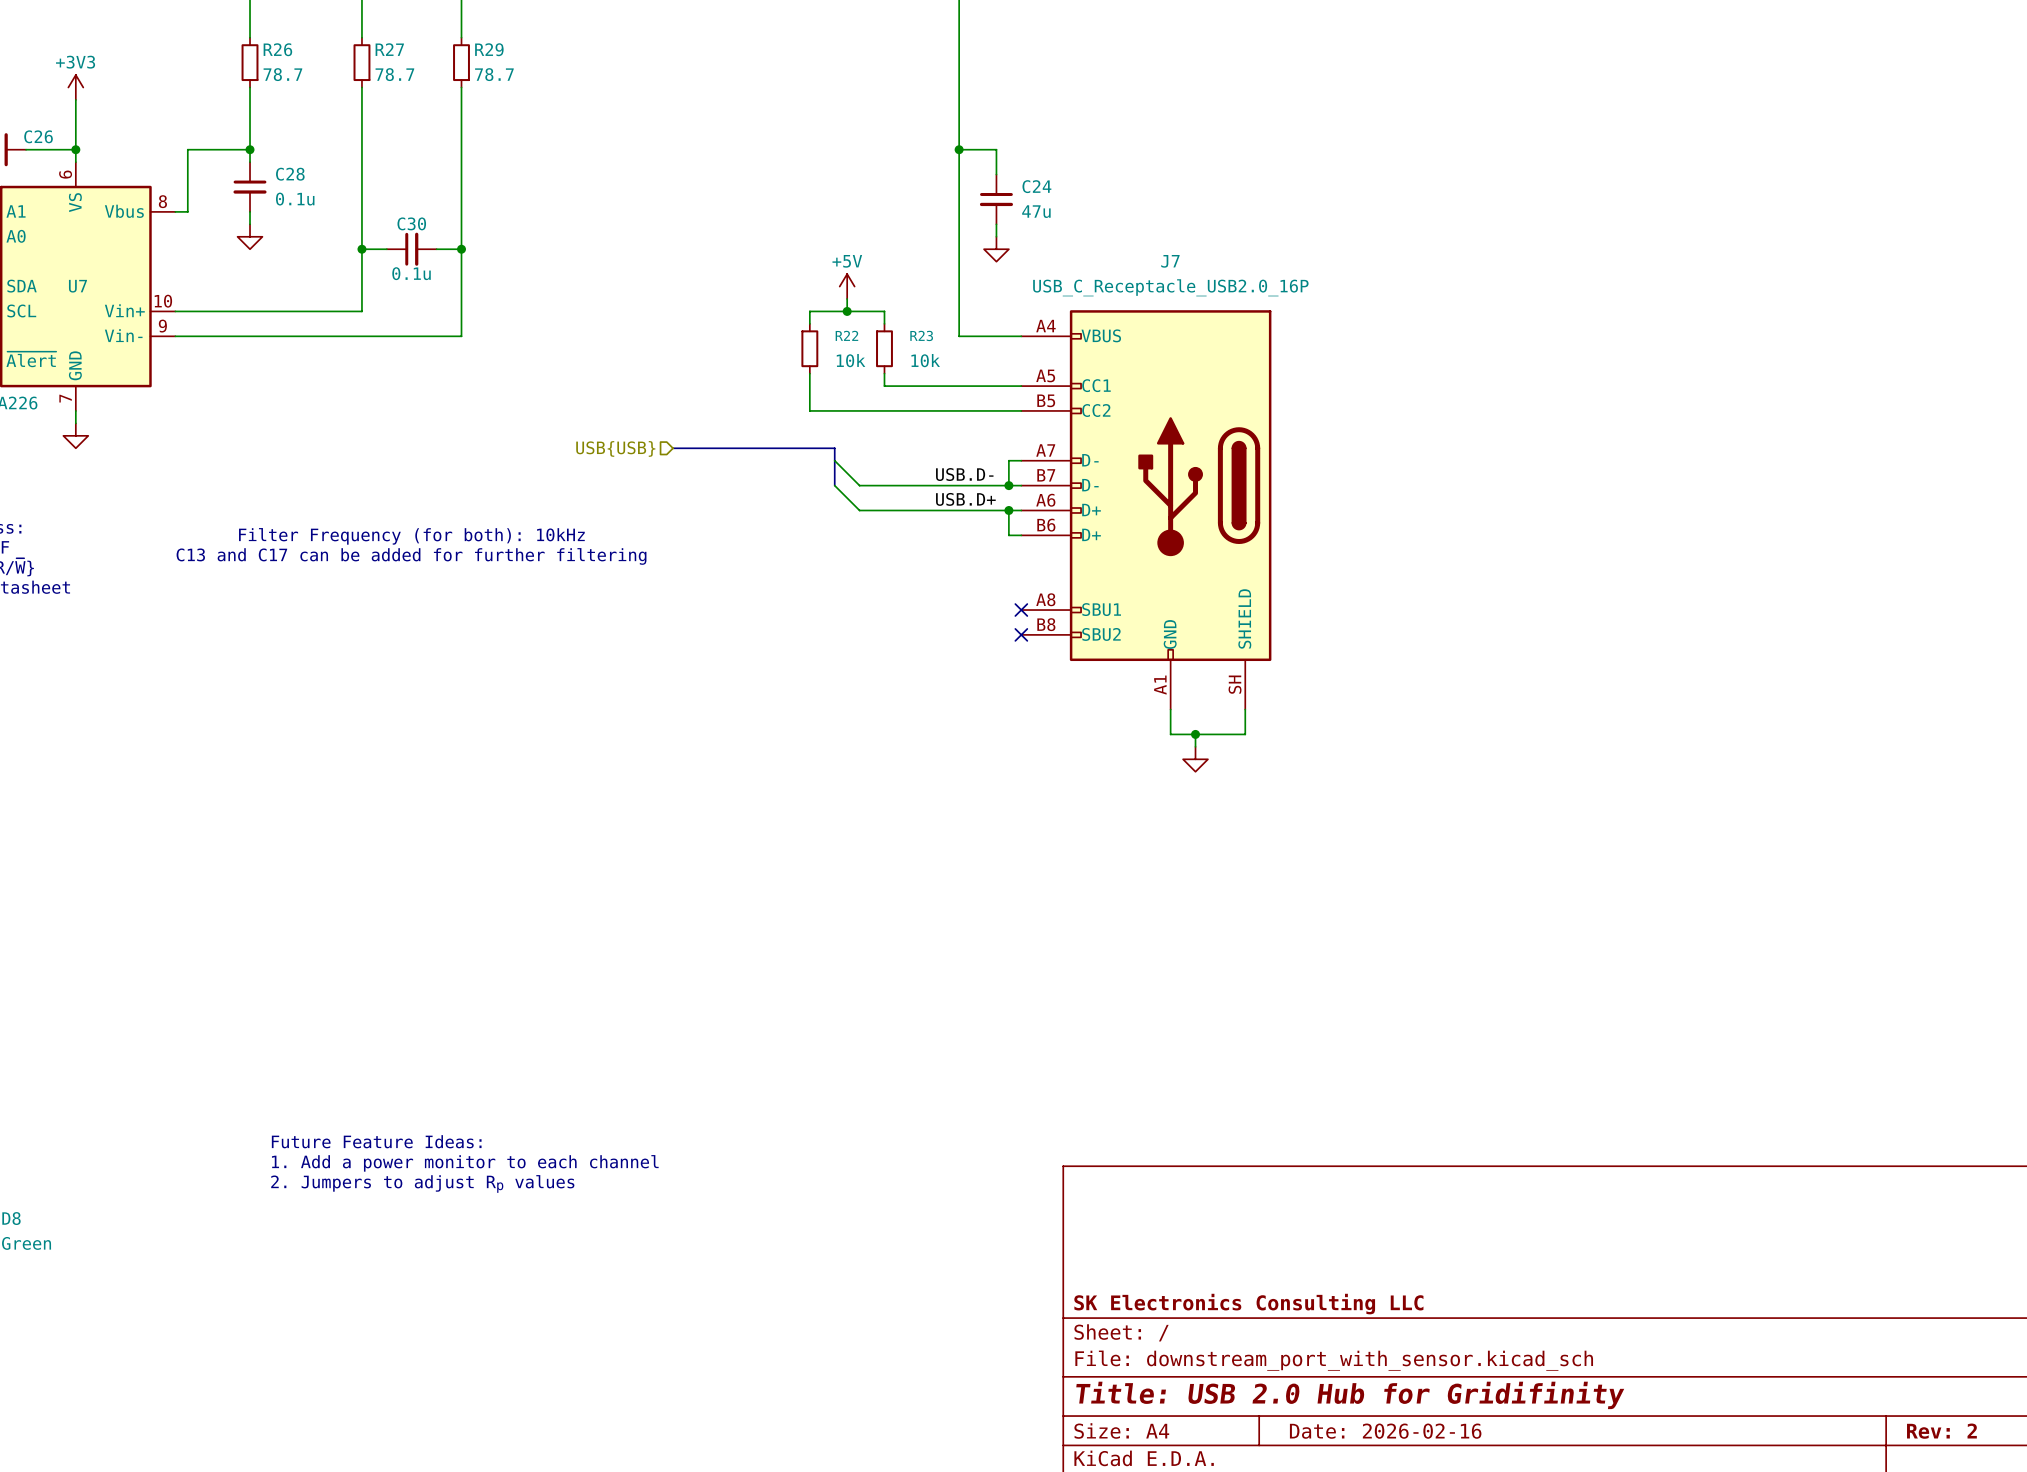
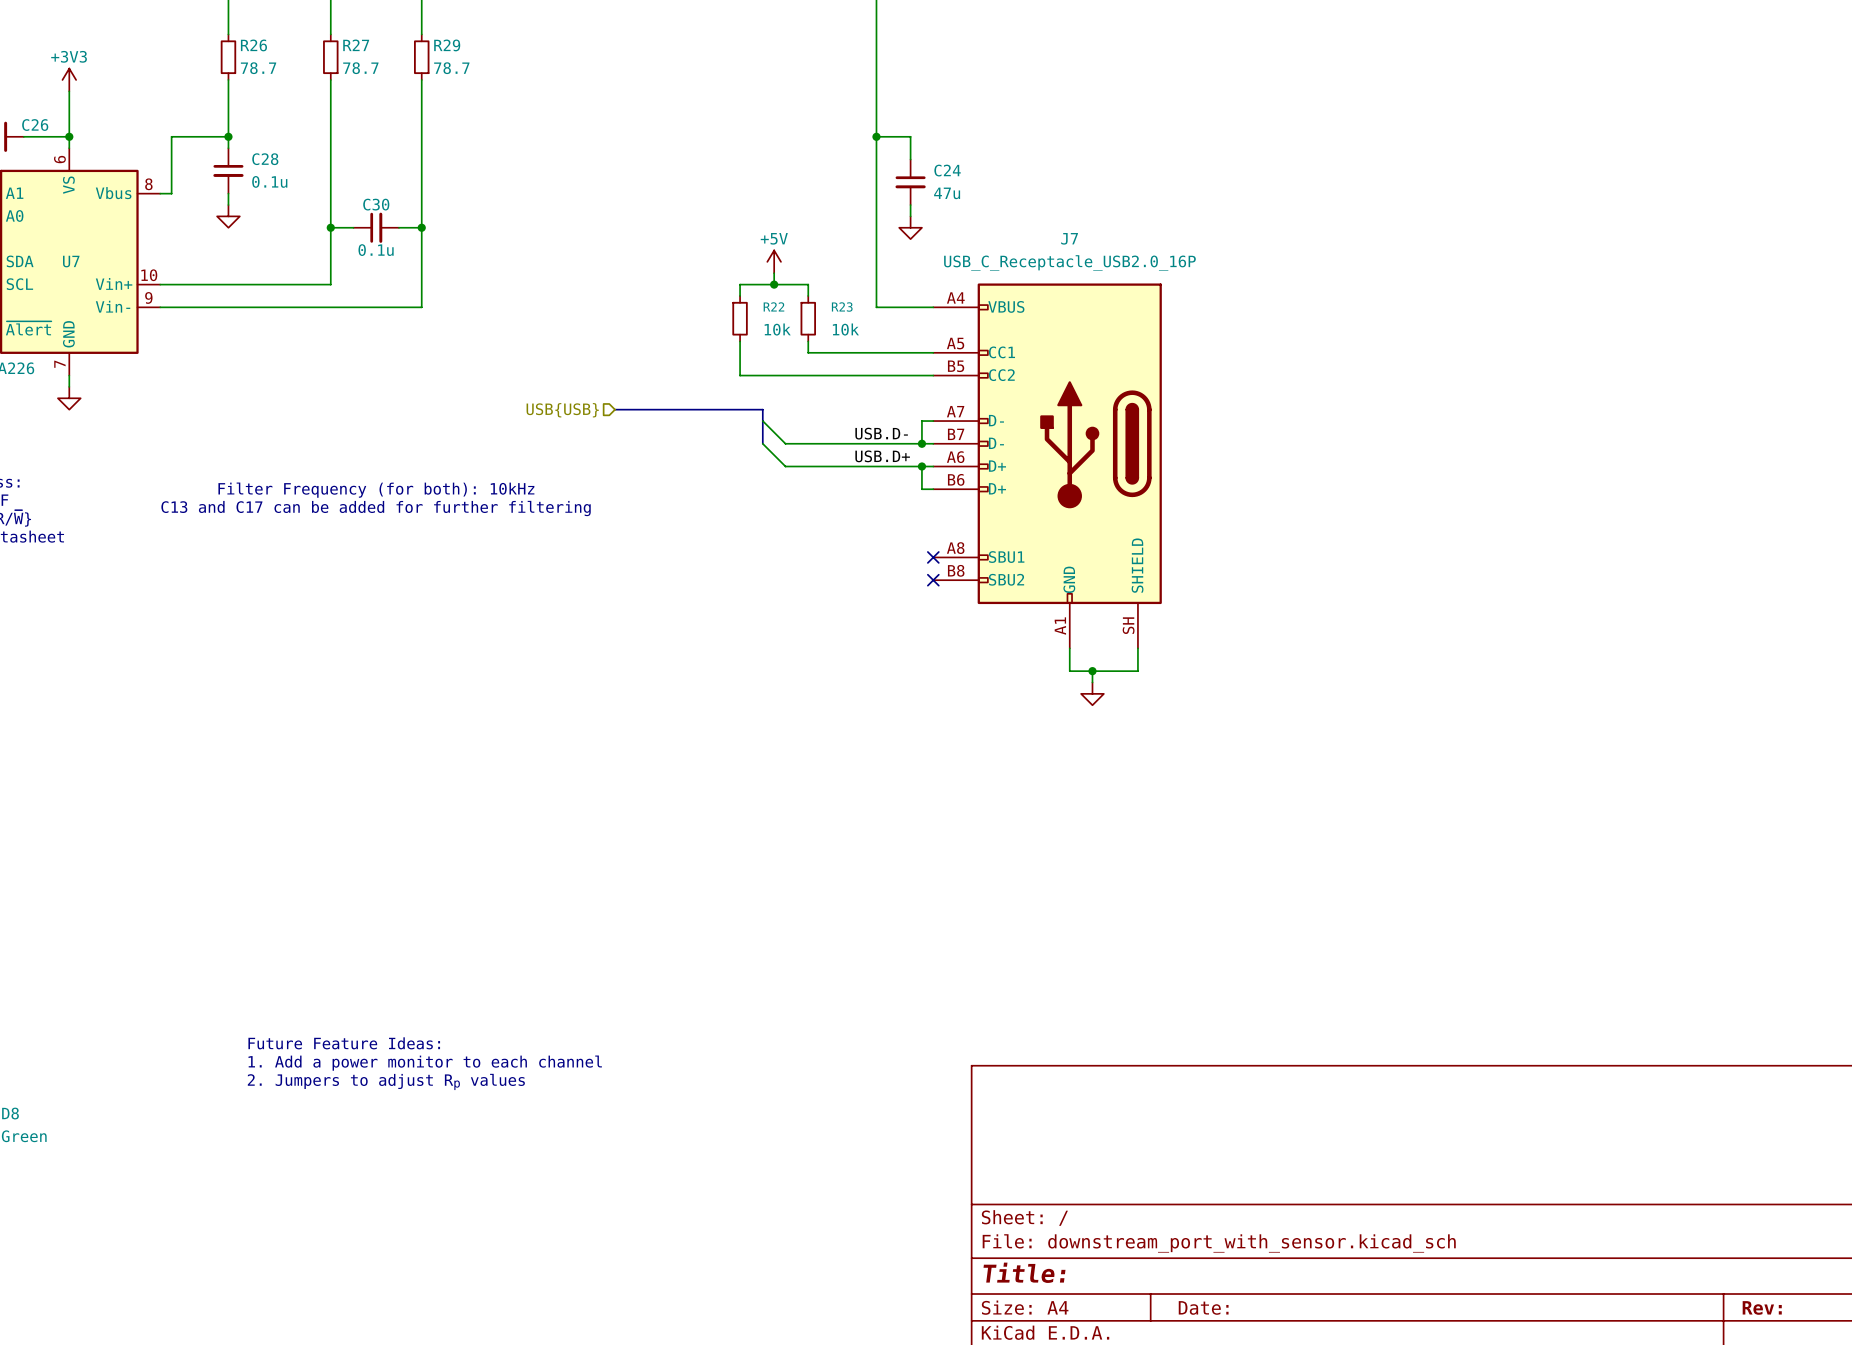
title block: SK Electronics Consulting LLC (1248, 1304) -> none
title block: Title: USB 2.0 Hub for Gridifinity (1350, 1395) -> Title: (1024, 1272)
title block: Date: 2026-02-16 (1385, 1431) -> Date: (1203, 1307)
title block: Rev: 2 (1941, 1431) -> Rev: (1762, 1307)

